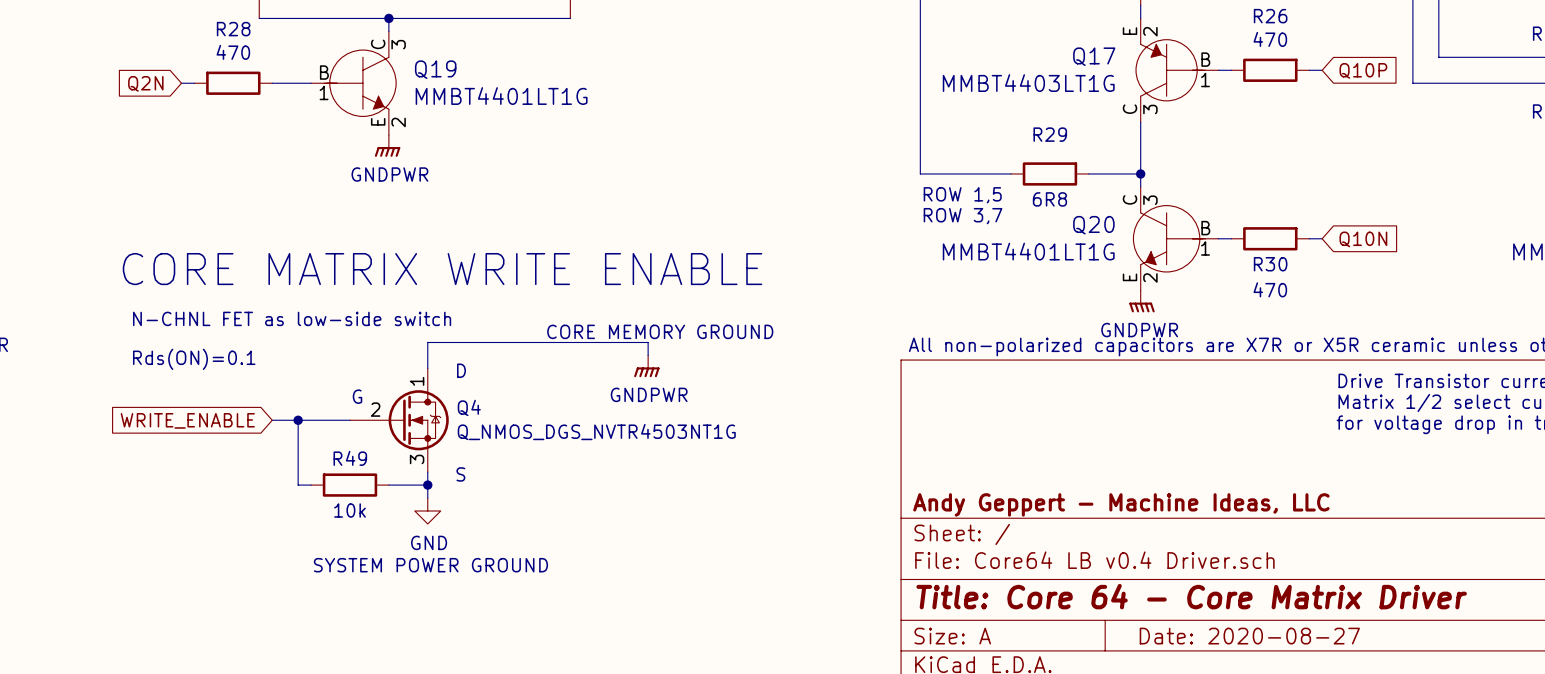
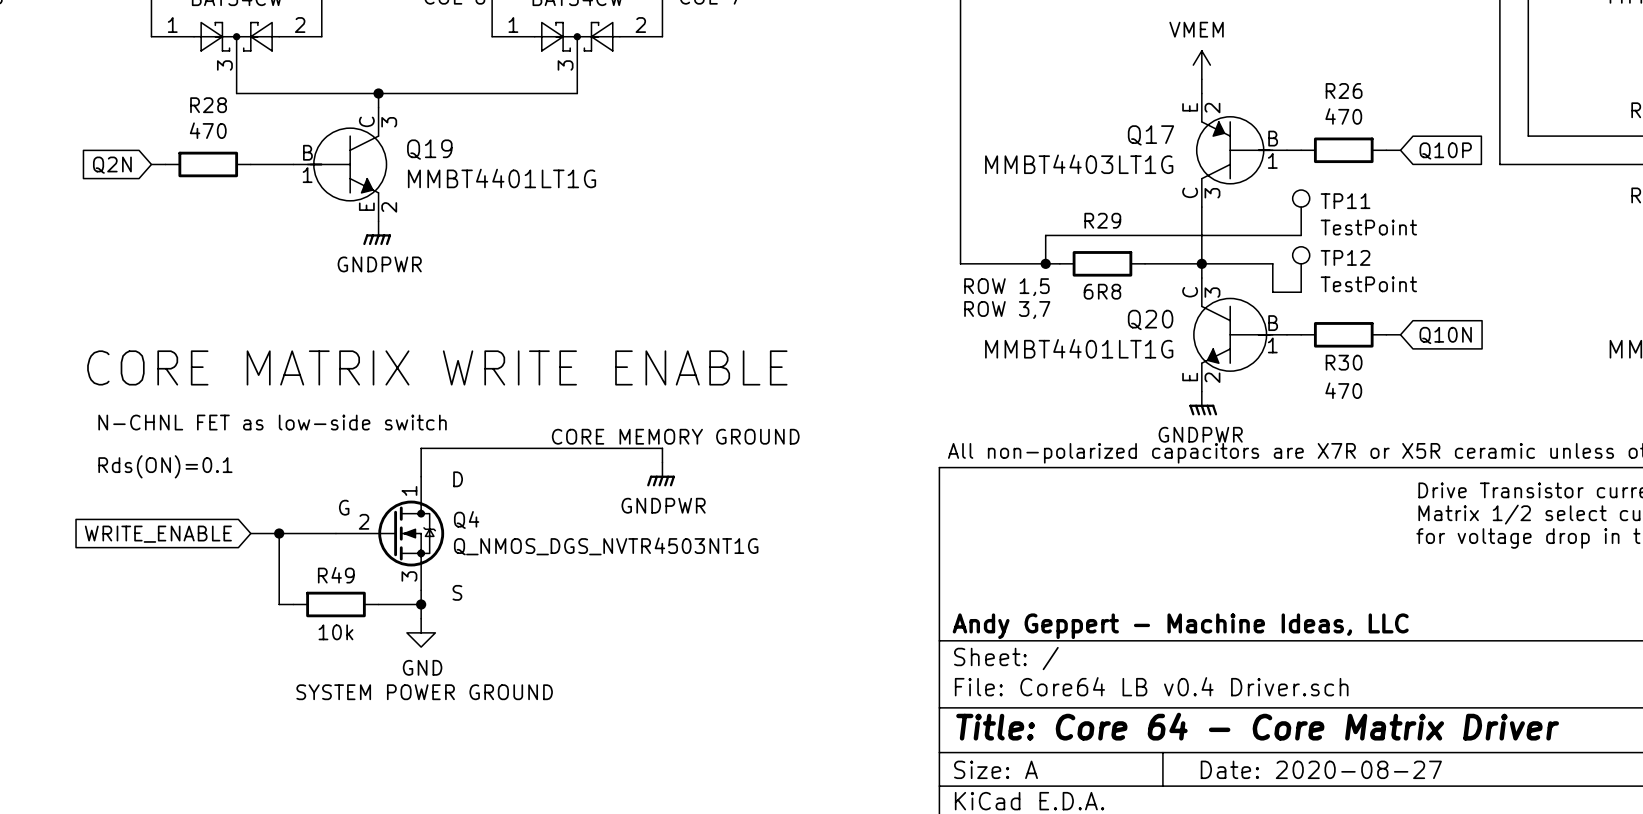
TP11: none -> TestPoint (1301, 212)
wire: none -> (1301, 235) (1045, 235) (1045, 263)
junction: none -> (1045, 263)
wire: none -> (1201, 263) (1272, 263) (1272, 292) (1301, 292)
TP12: none -> TestPoint (1301, 269)

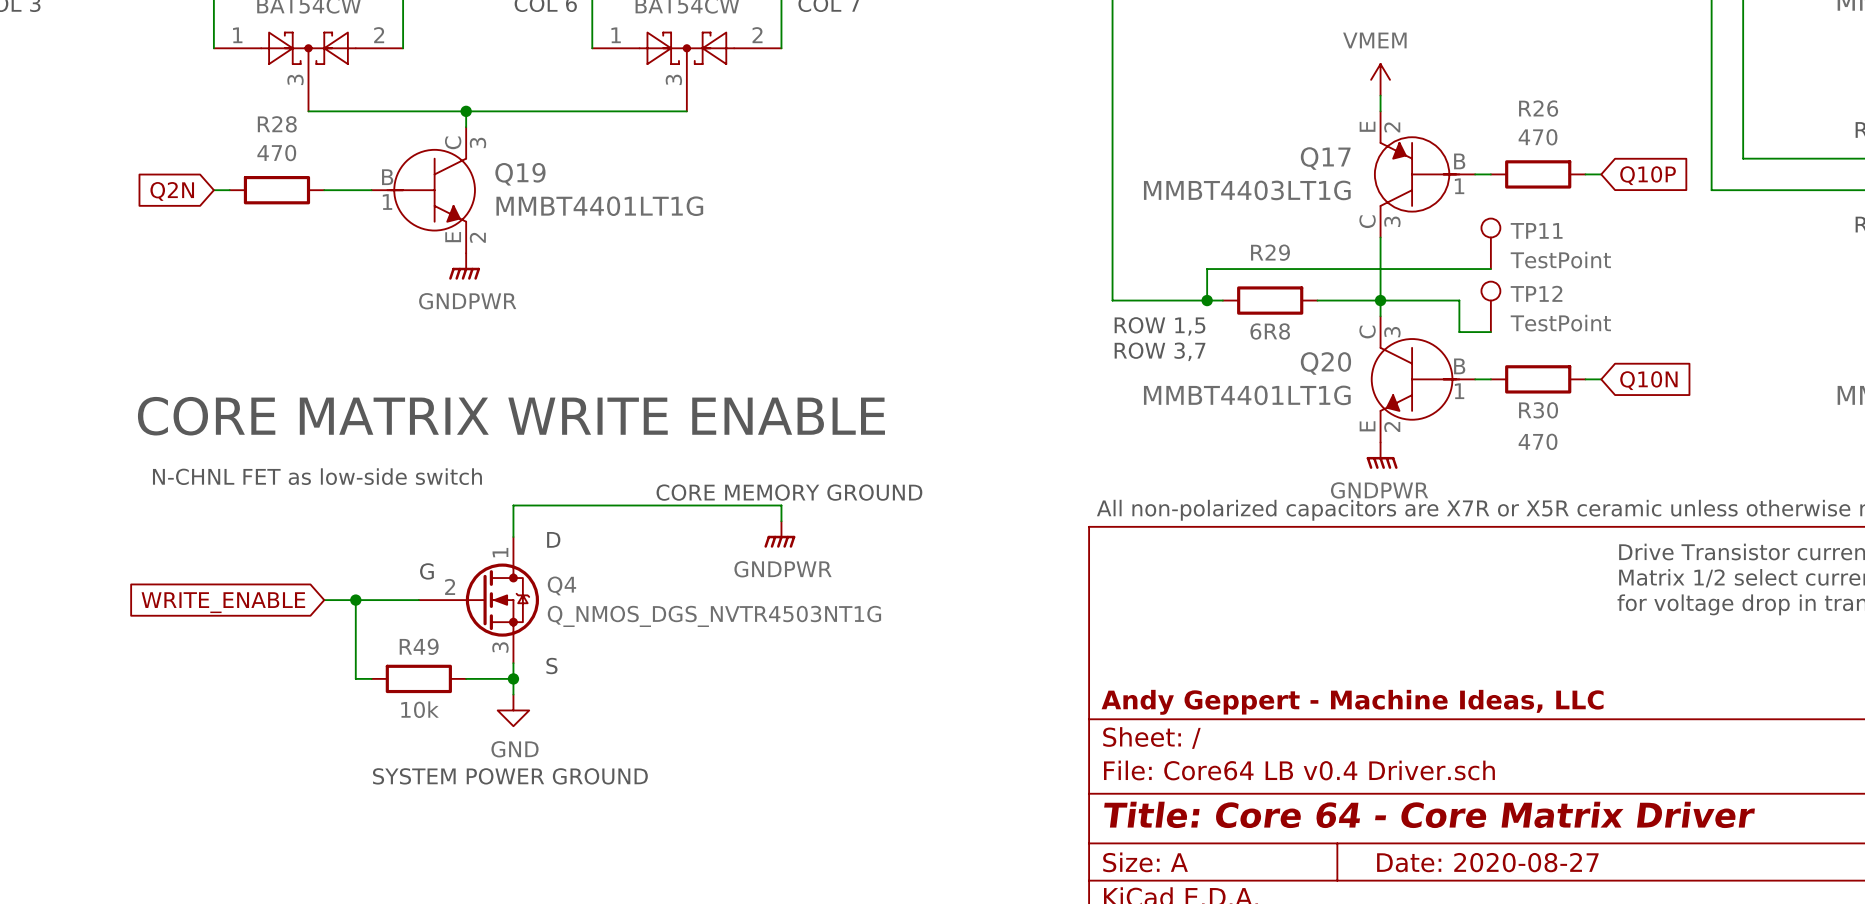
text: Rds(ON)=0.1 (165, 466) -> none

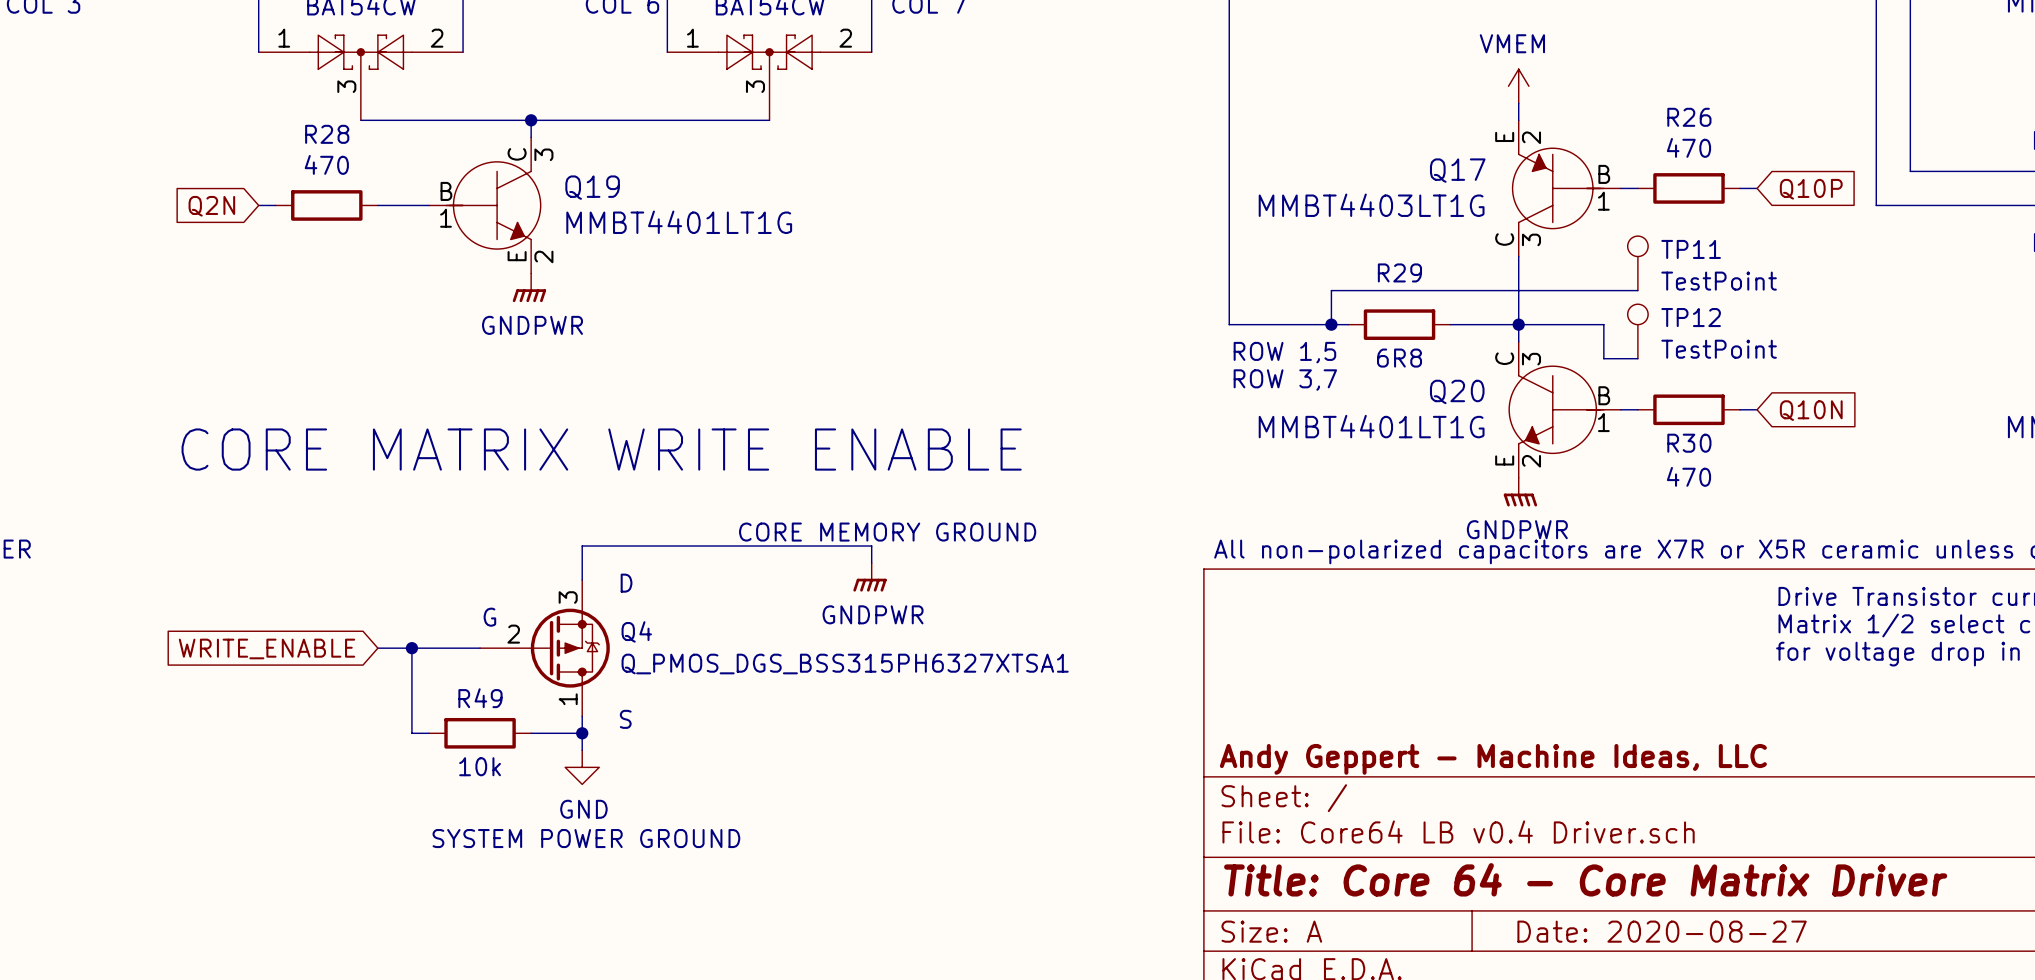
text: N-CHNL FET as low-side switch (317, 476) -> none
Q4 symbol: [418, 537, 539, 664] -> [480, 580, 610, 717]
Q4 value: Q_NMOS_DGS_NVTR4503NT1G (714, 616) -> Q_PMOS_DGS_BSS315PH6327XTSA1 (845, 664)

